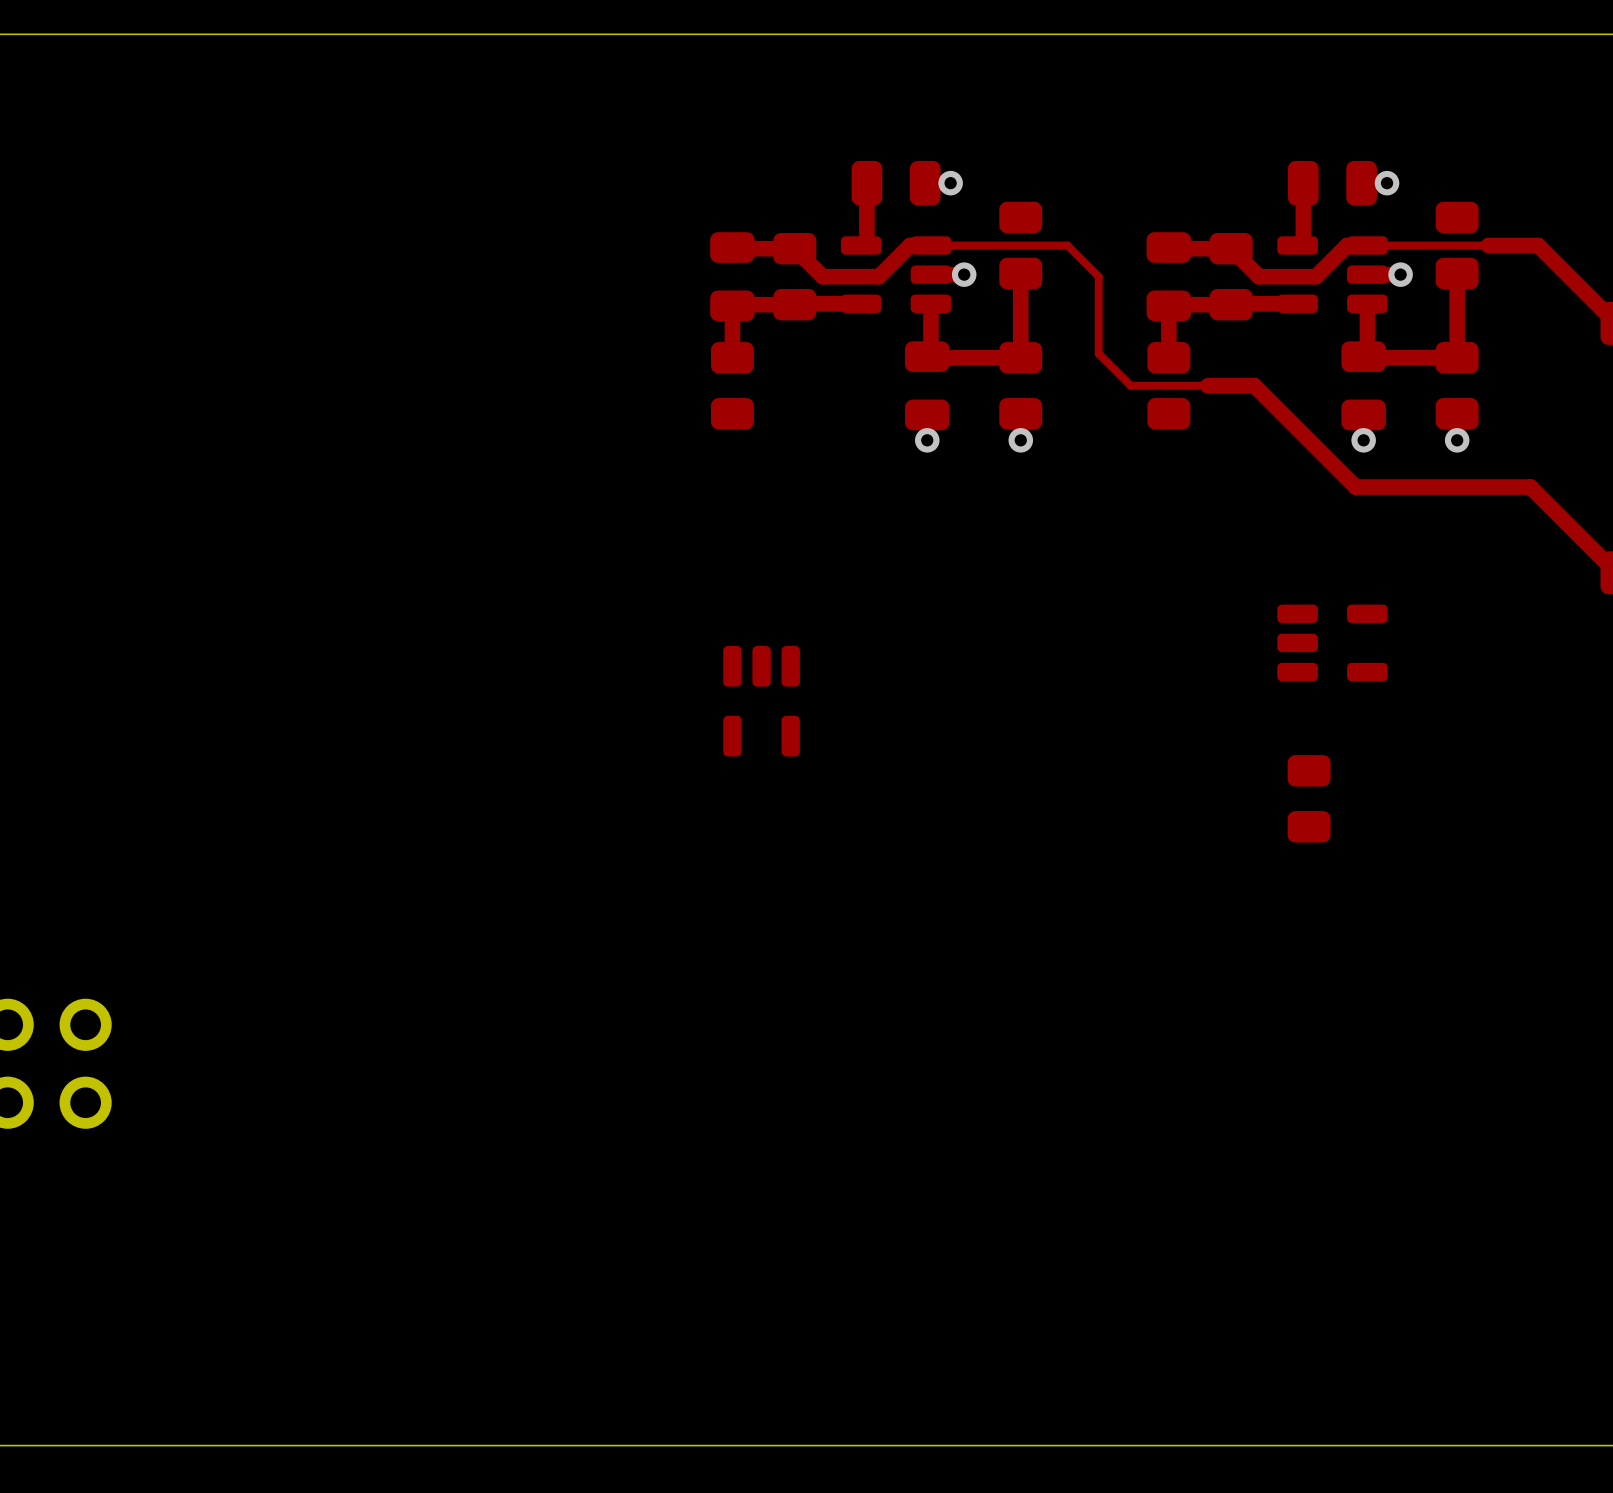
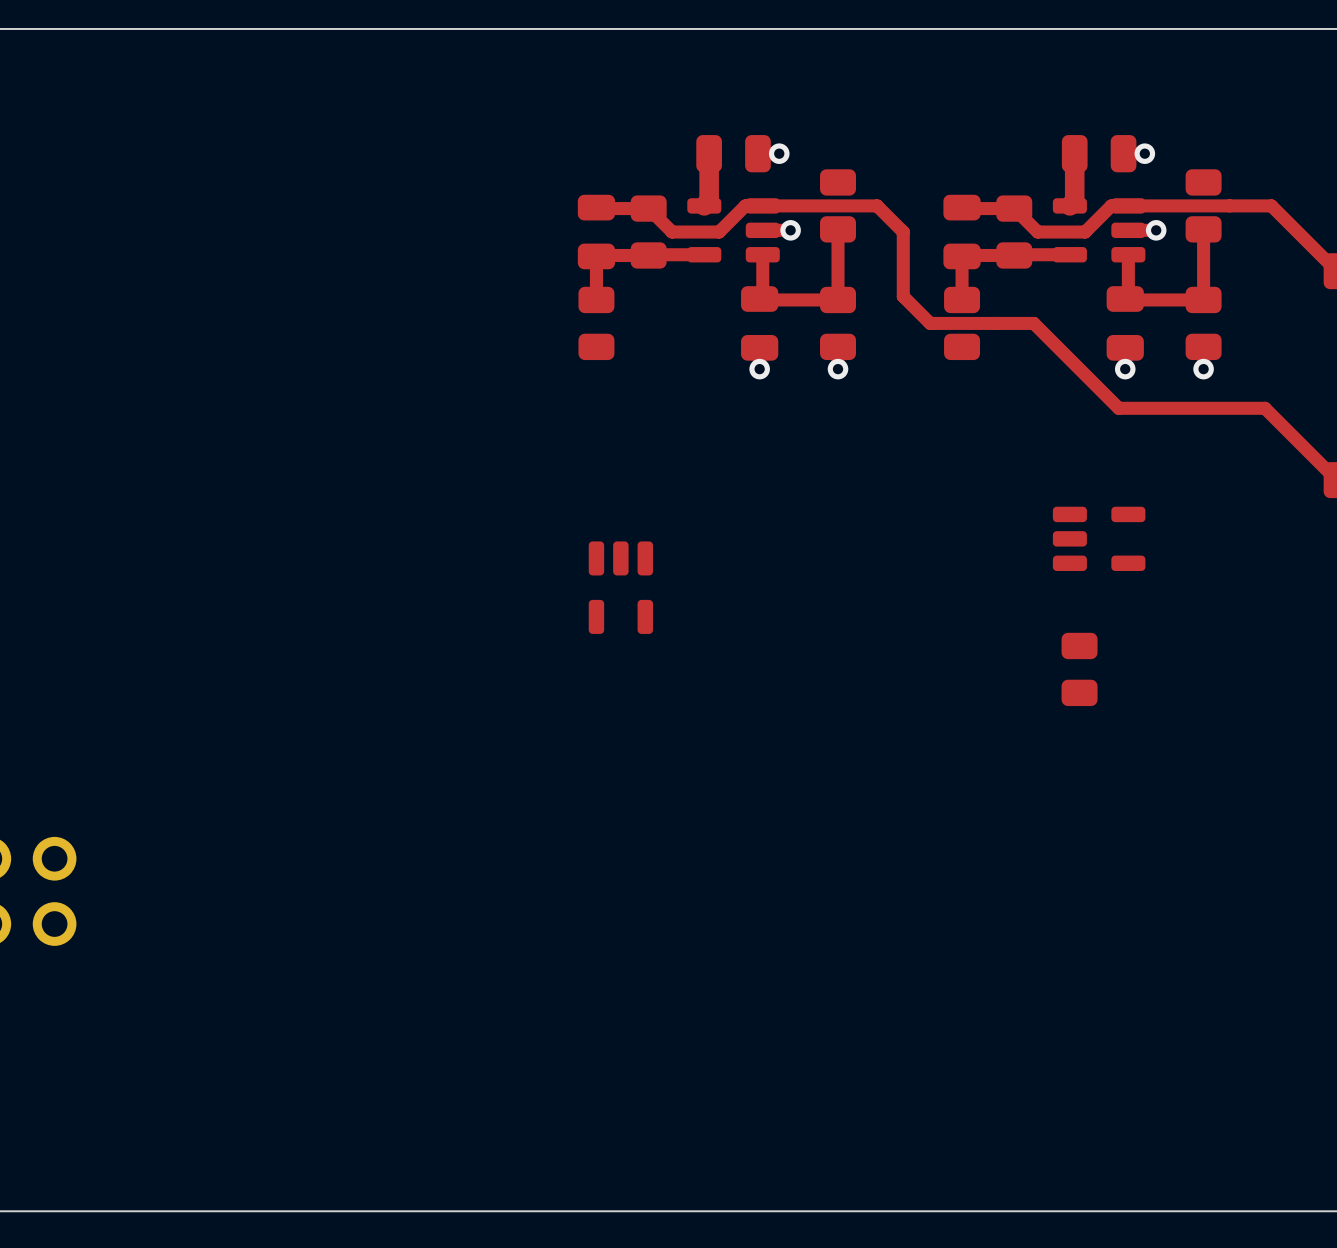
top track width: thin (866, 183) (866, 239) (861, 245) -> thick (709, 153) (709, 201) (704, 205)
top track width: thin (1303, 183) (1303, 239) (1297, 245) -> thick (1074, 153) (1074, 201) (1069, 205)
top track width: thin (930, 245) (1067, 245) (1098, 276) (1098, 353) (1130, 385) (1207, 385) -> thick (762, 205) (877, 205) (903, 232) (903, 296) (930, 323) (994, 323)
top track width: thin (1488, 245) (1367, 245) -> thick (1229, 205) (1128, 205)

